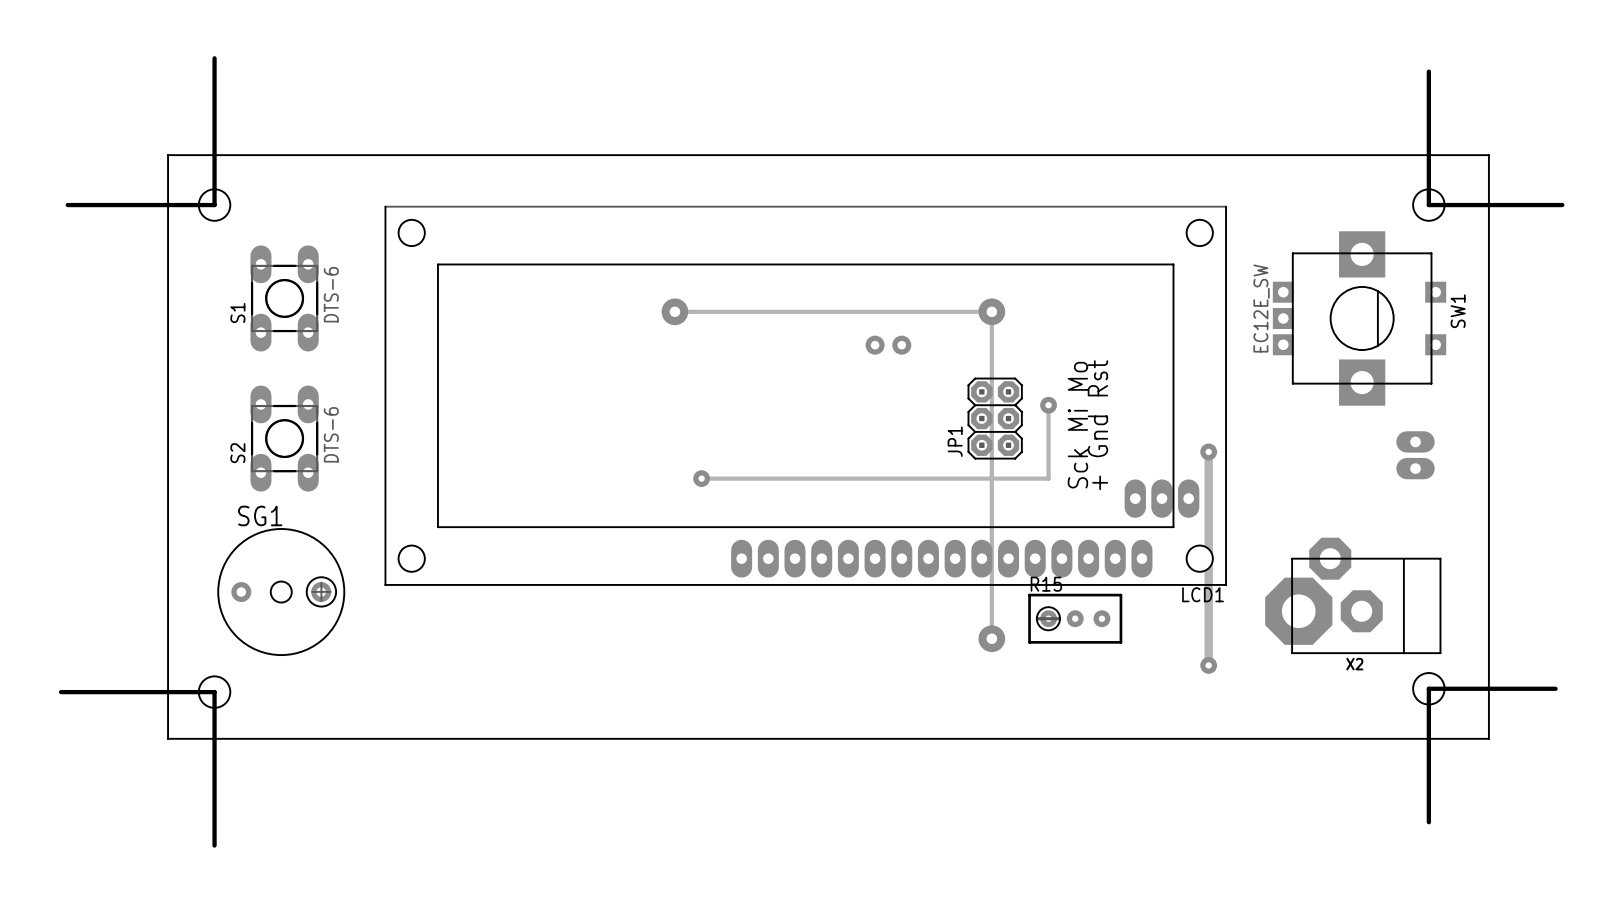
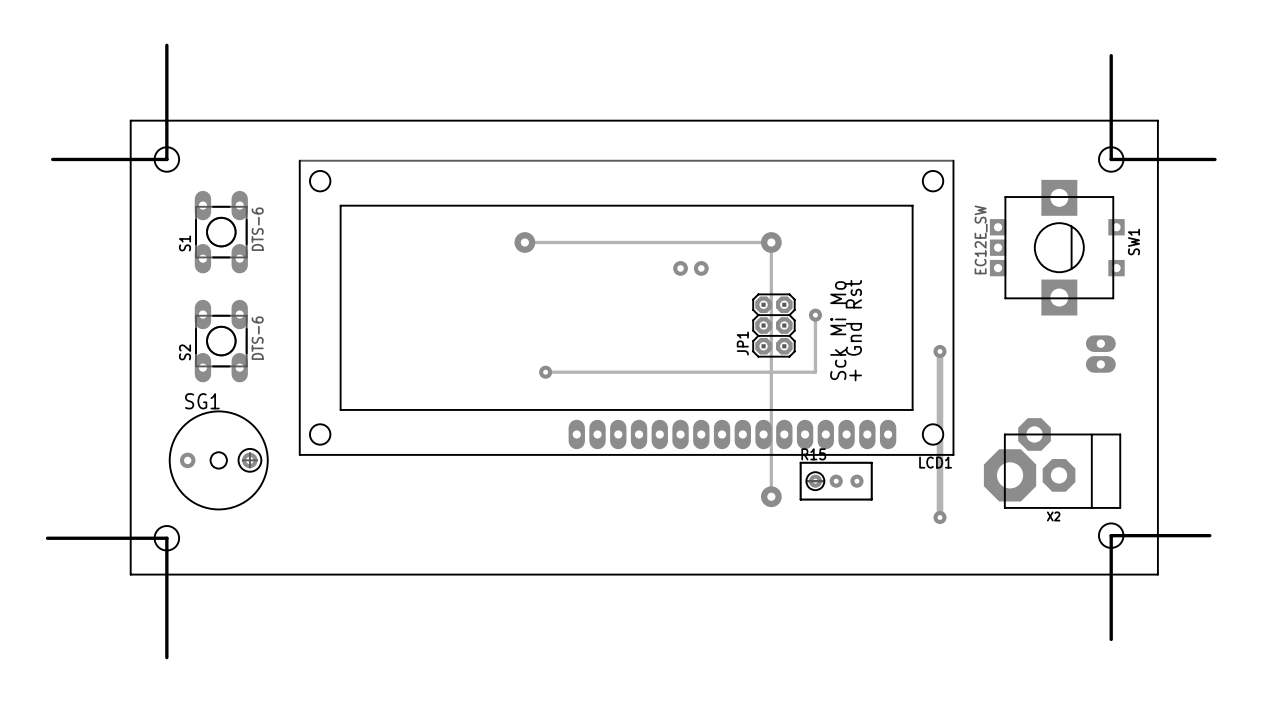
part: (1161, 498) -> none

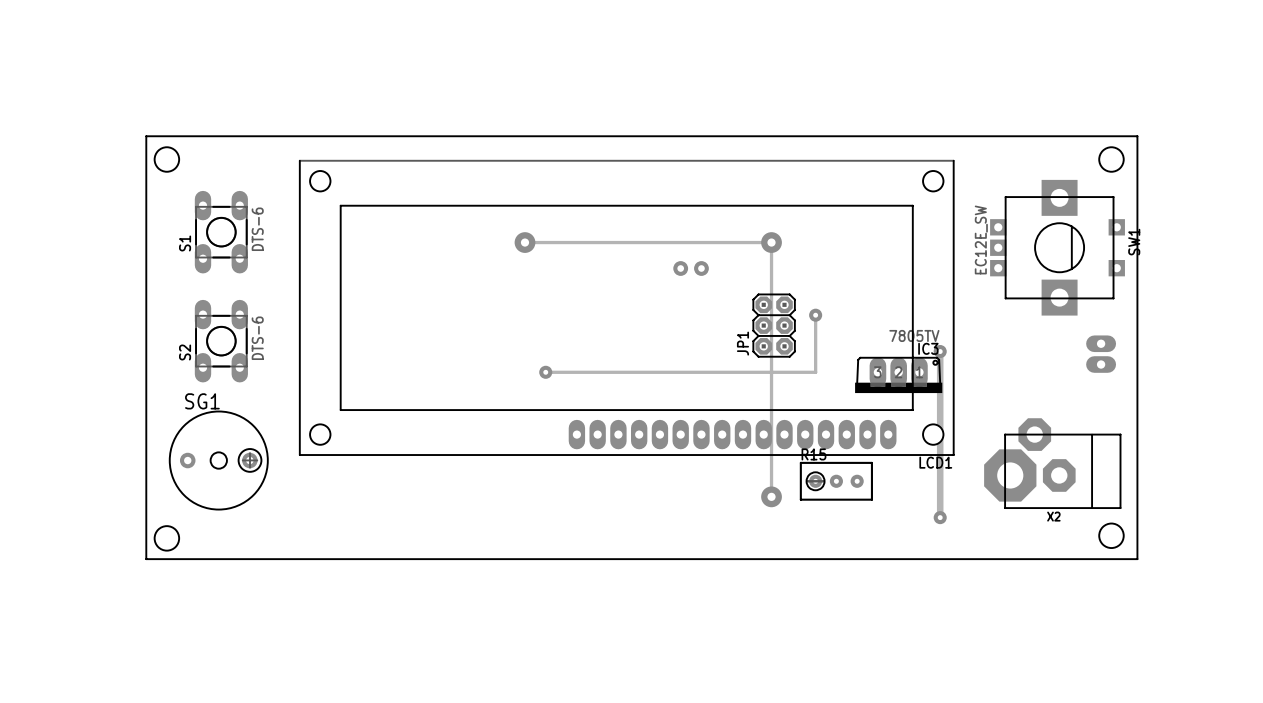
board edge: (166, 45) (166, 159) (52, 159) -> none
board edge: (1111, 55) (1111, 159) (1214, 159) -> none
board edge: (1157, 120) (130, 120) (130, 574) (1157, 574) (1157, 120) -> (1137, 136) (1137, 559) (146, 559) (146, 136) (1137, 136)
text: Sck Mi Mo (838, 330) -> none
text: + Gnd Rst (853, 330) -> none
IC3: none -> 7805TV (898, 375)
board edge: (1209, 535) (1111, 535) (1111, 639) -> none
board edge: (47, 538) (166, 538) (166, 657) -> none

